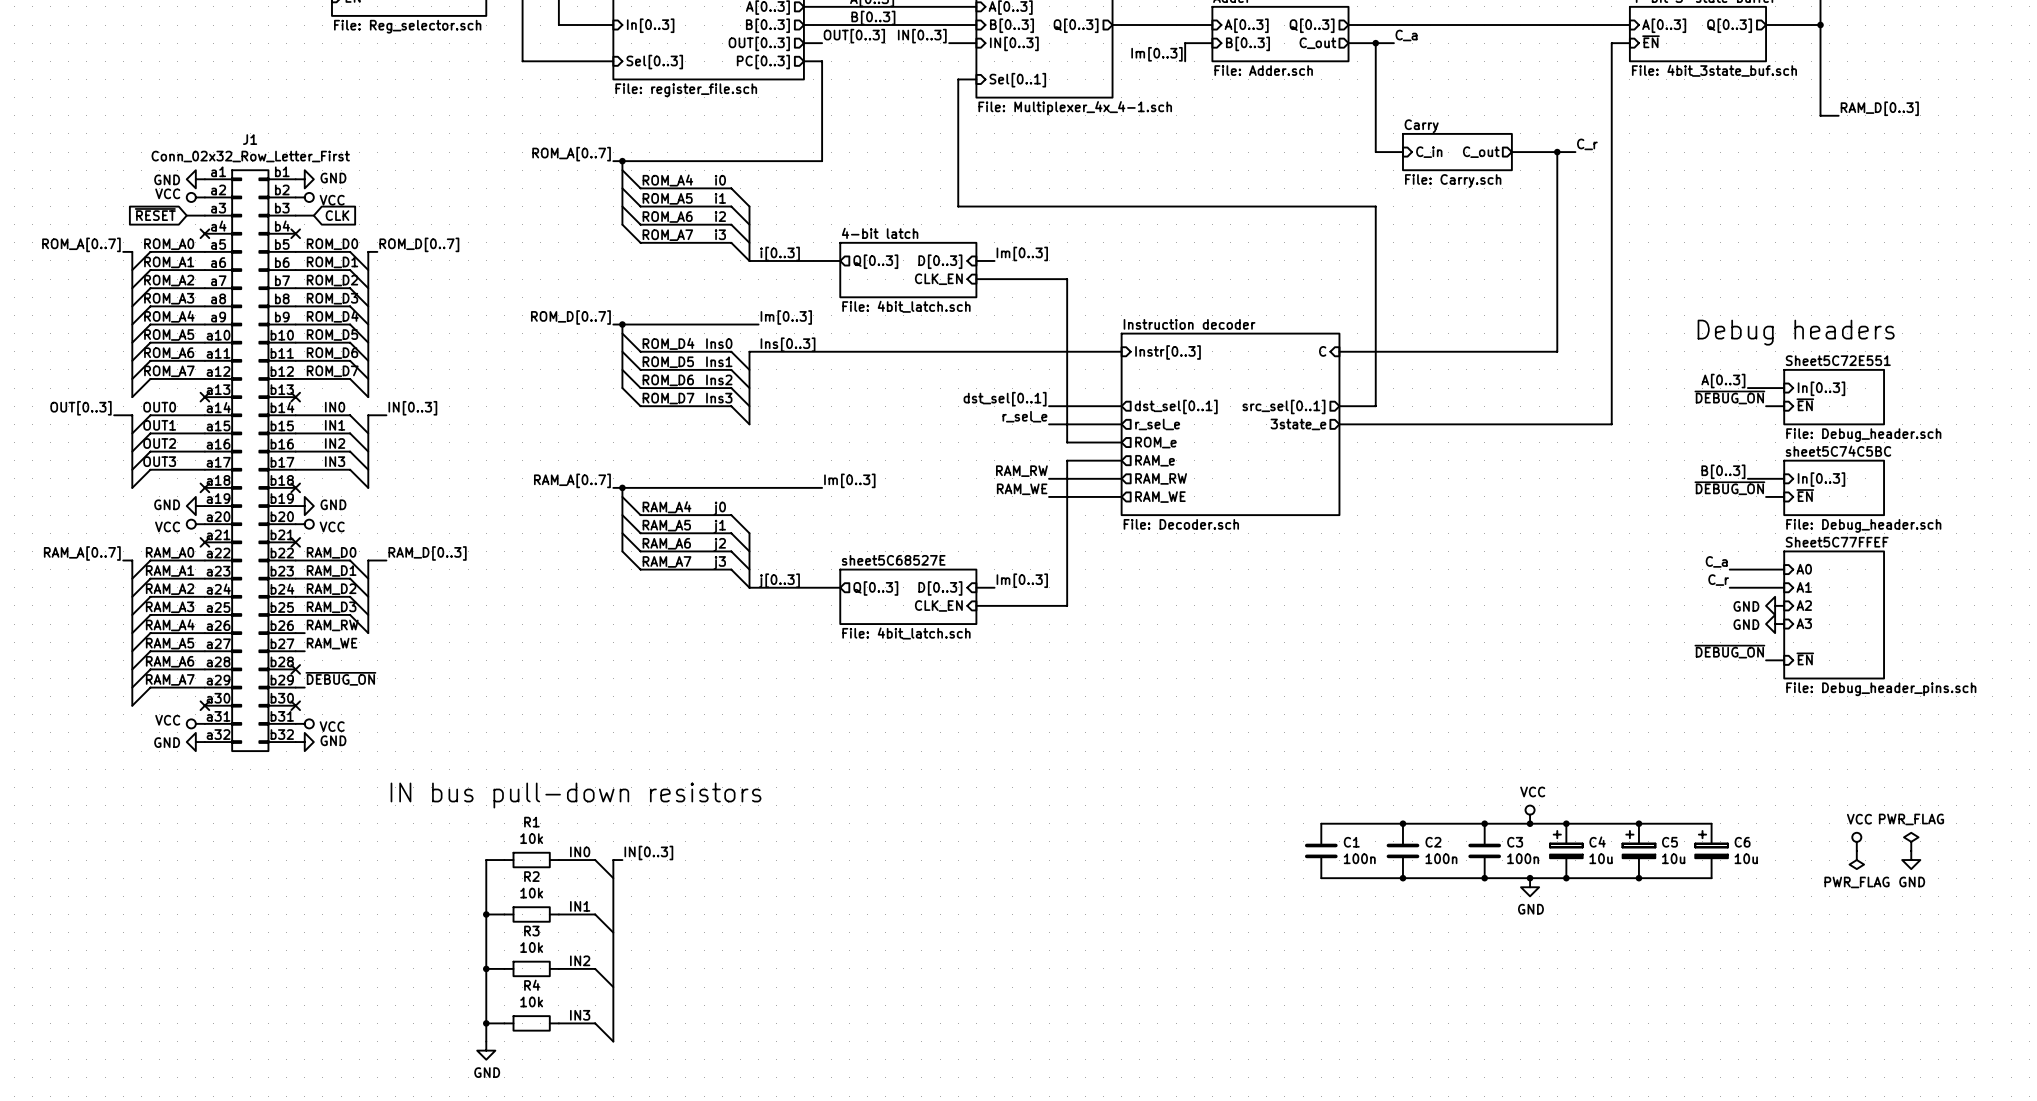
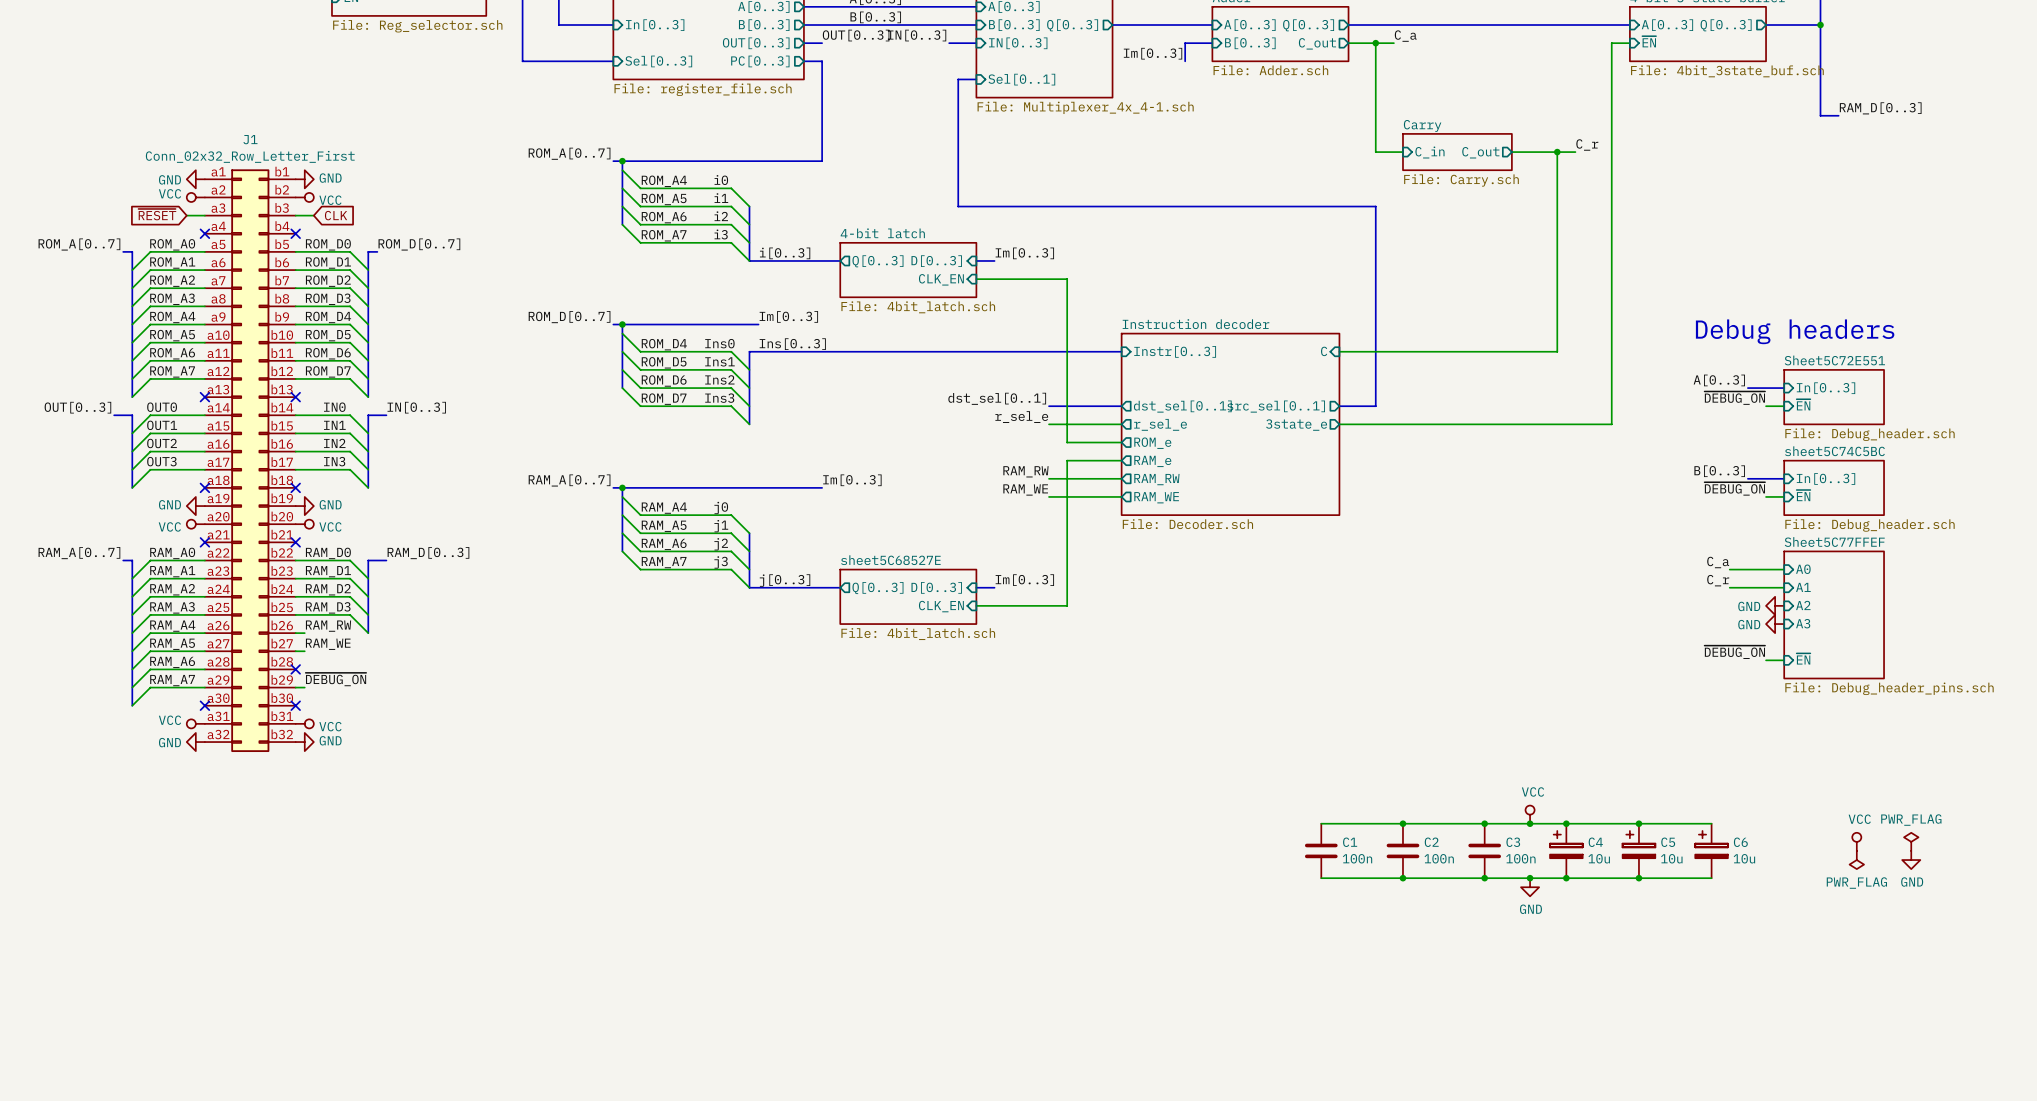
text: IN bus pull-down resistors (576, 795) -> none
label: IN0 (580, 851) -> none
label: IN[0..3] (648, 853) -> none
wire: (504, 860) (486, 860) (486, 1041) -> none
R1: 10k (531, 860) -> none
wire: (558, 860) (595, 860) (613, 878) -> none
bus: (622, 860) (613, 860) (613, 1041) -> none
label: IN1 (580, 906) -> none
wire: (486, 914) (504, 914) -> none
junction: (486, 914) -> none
R2: 10k (531, 914) -> none
wire: (558, 914) (595, 914) (613, 932) -> none
label: IN2 (580, 960) -> none
wire: (486, 968) (504, 968) -> none
junction: (486, 968) -> none
R3: 10k (531, 968) -> none
wire: (558, 968) (595, 968) (613, 987) -> none
label: IN3 (580, 1015) -> none
wire: (486, 1023) (504, 1023) -> none
junction: (486, 1023) -> none
R4: 10k (531, 1023) -> none
wire: (558, 1023) (595, 1023) (613, 1041) -> none
power symbol: GND (486, 1050) -> none

